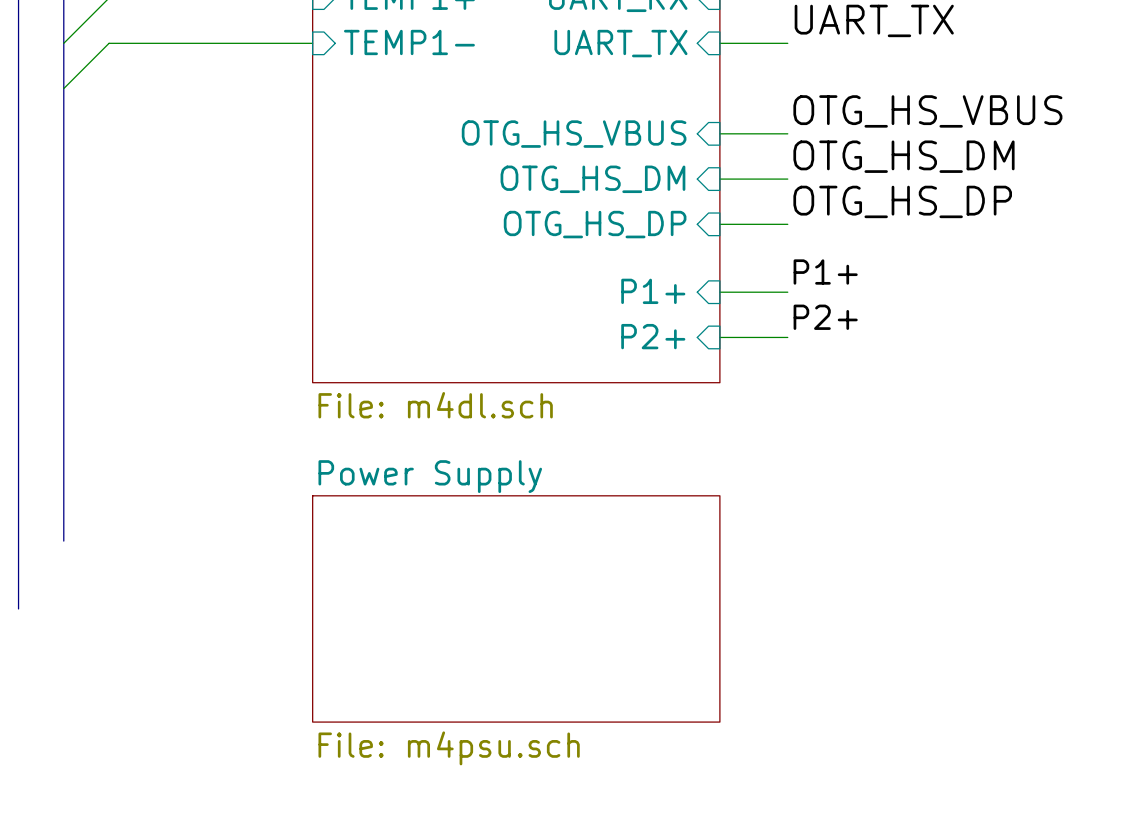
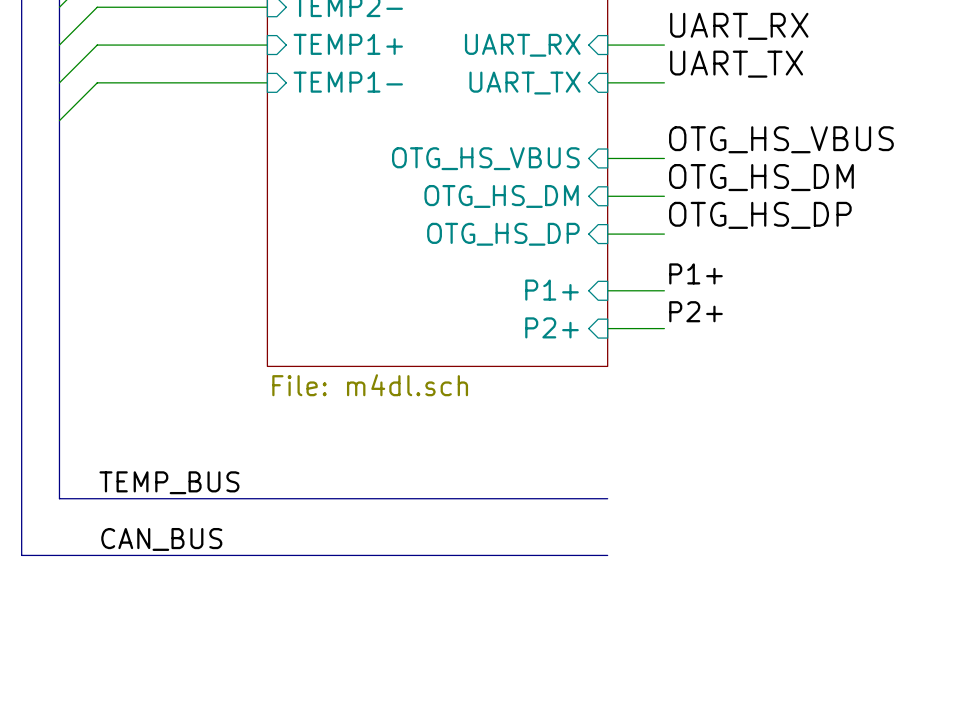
label: none -> TEMP_BUS (169, 482)
bus: none -> (59, 498) (607, 498)
label: none -> CAN_BUS (161, 539)
bus: none -> (21, 555) (607, 555)
sheet Power Supply: File: m4psu.sch (516, 608) -> none

